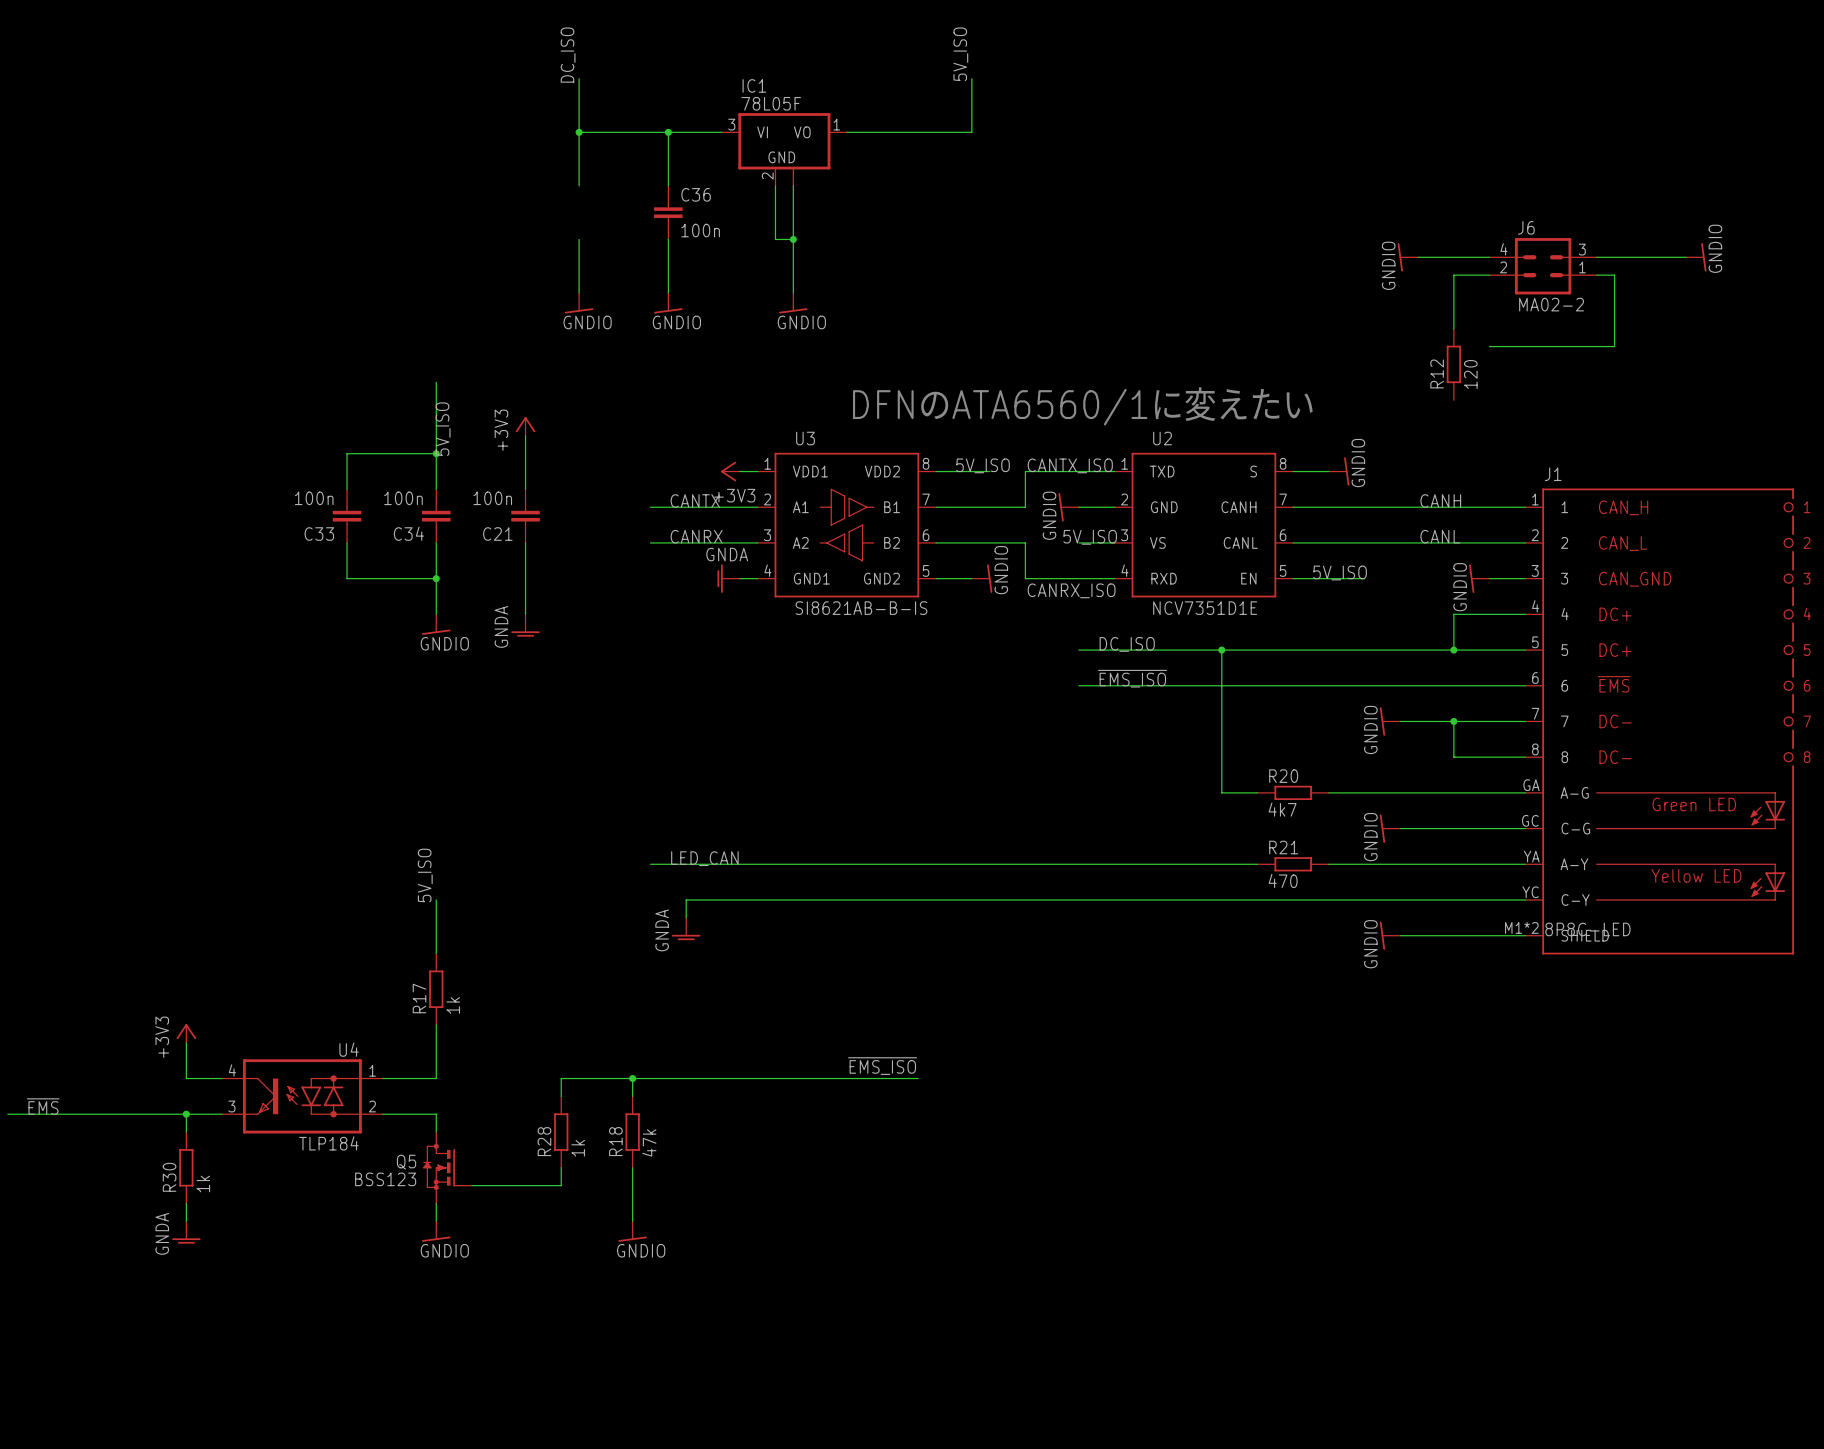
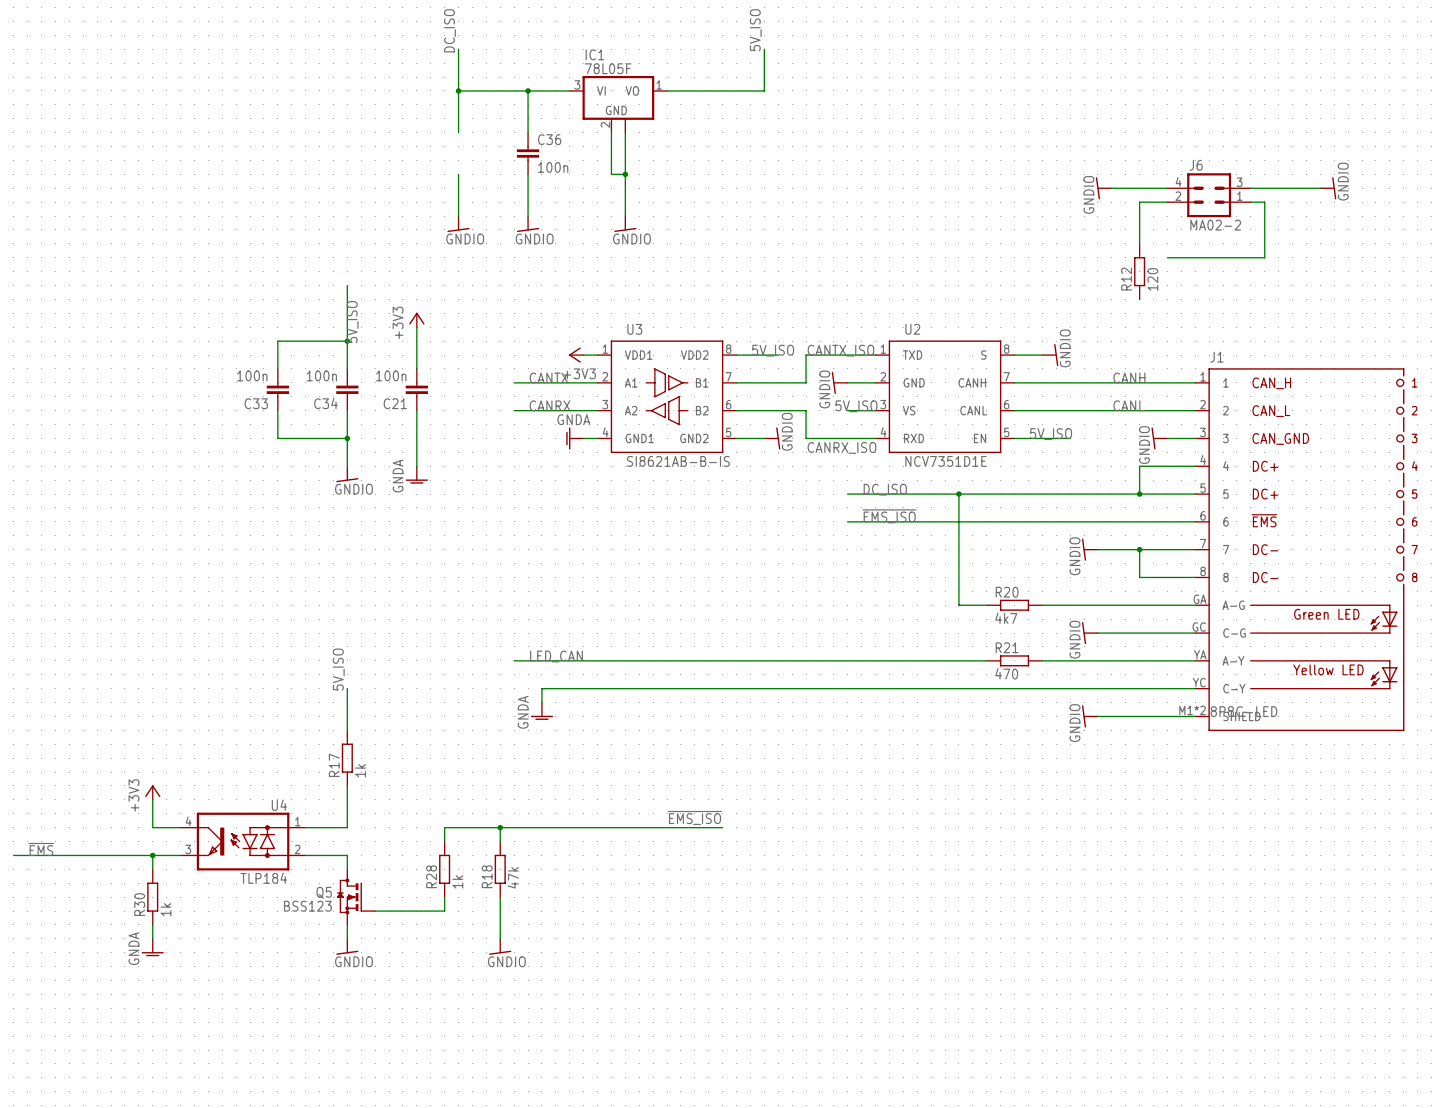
text: DFNのATA6560/1に変えたい (1083, 405) -> none

